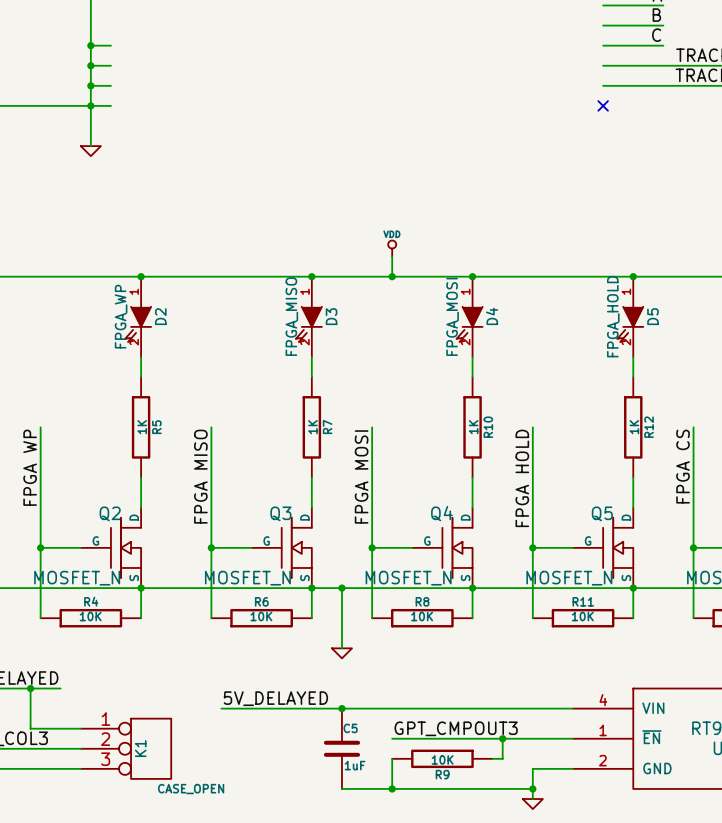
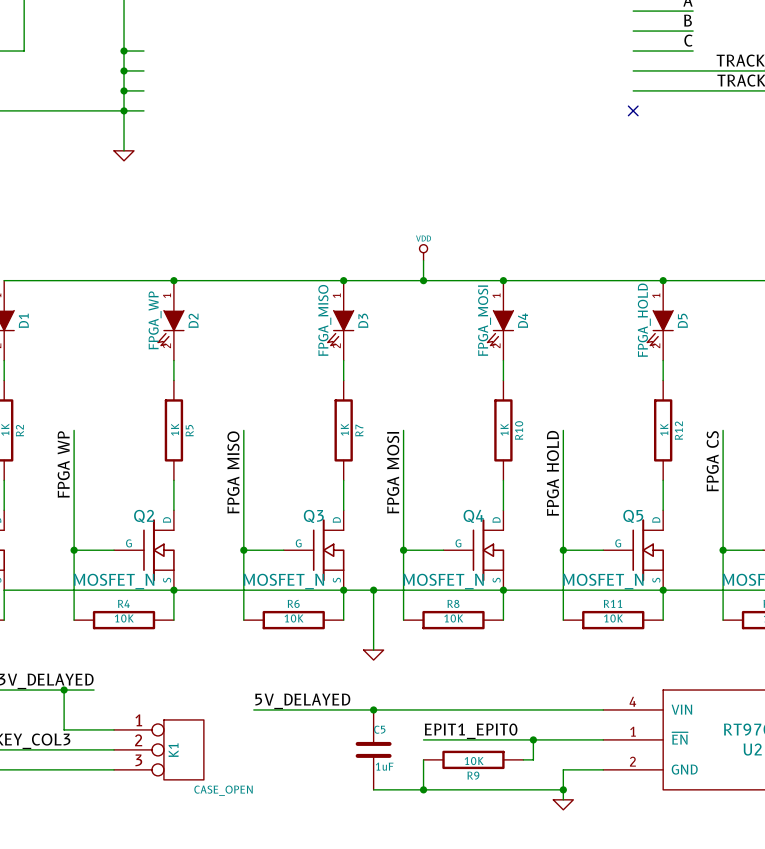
label: GPT_CMPOUT3 (456, 728) -> EPIT1_EPIT0 (471, 731)

